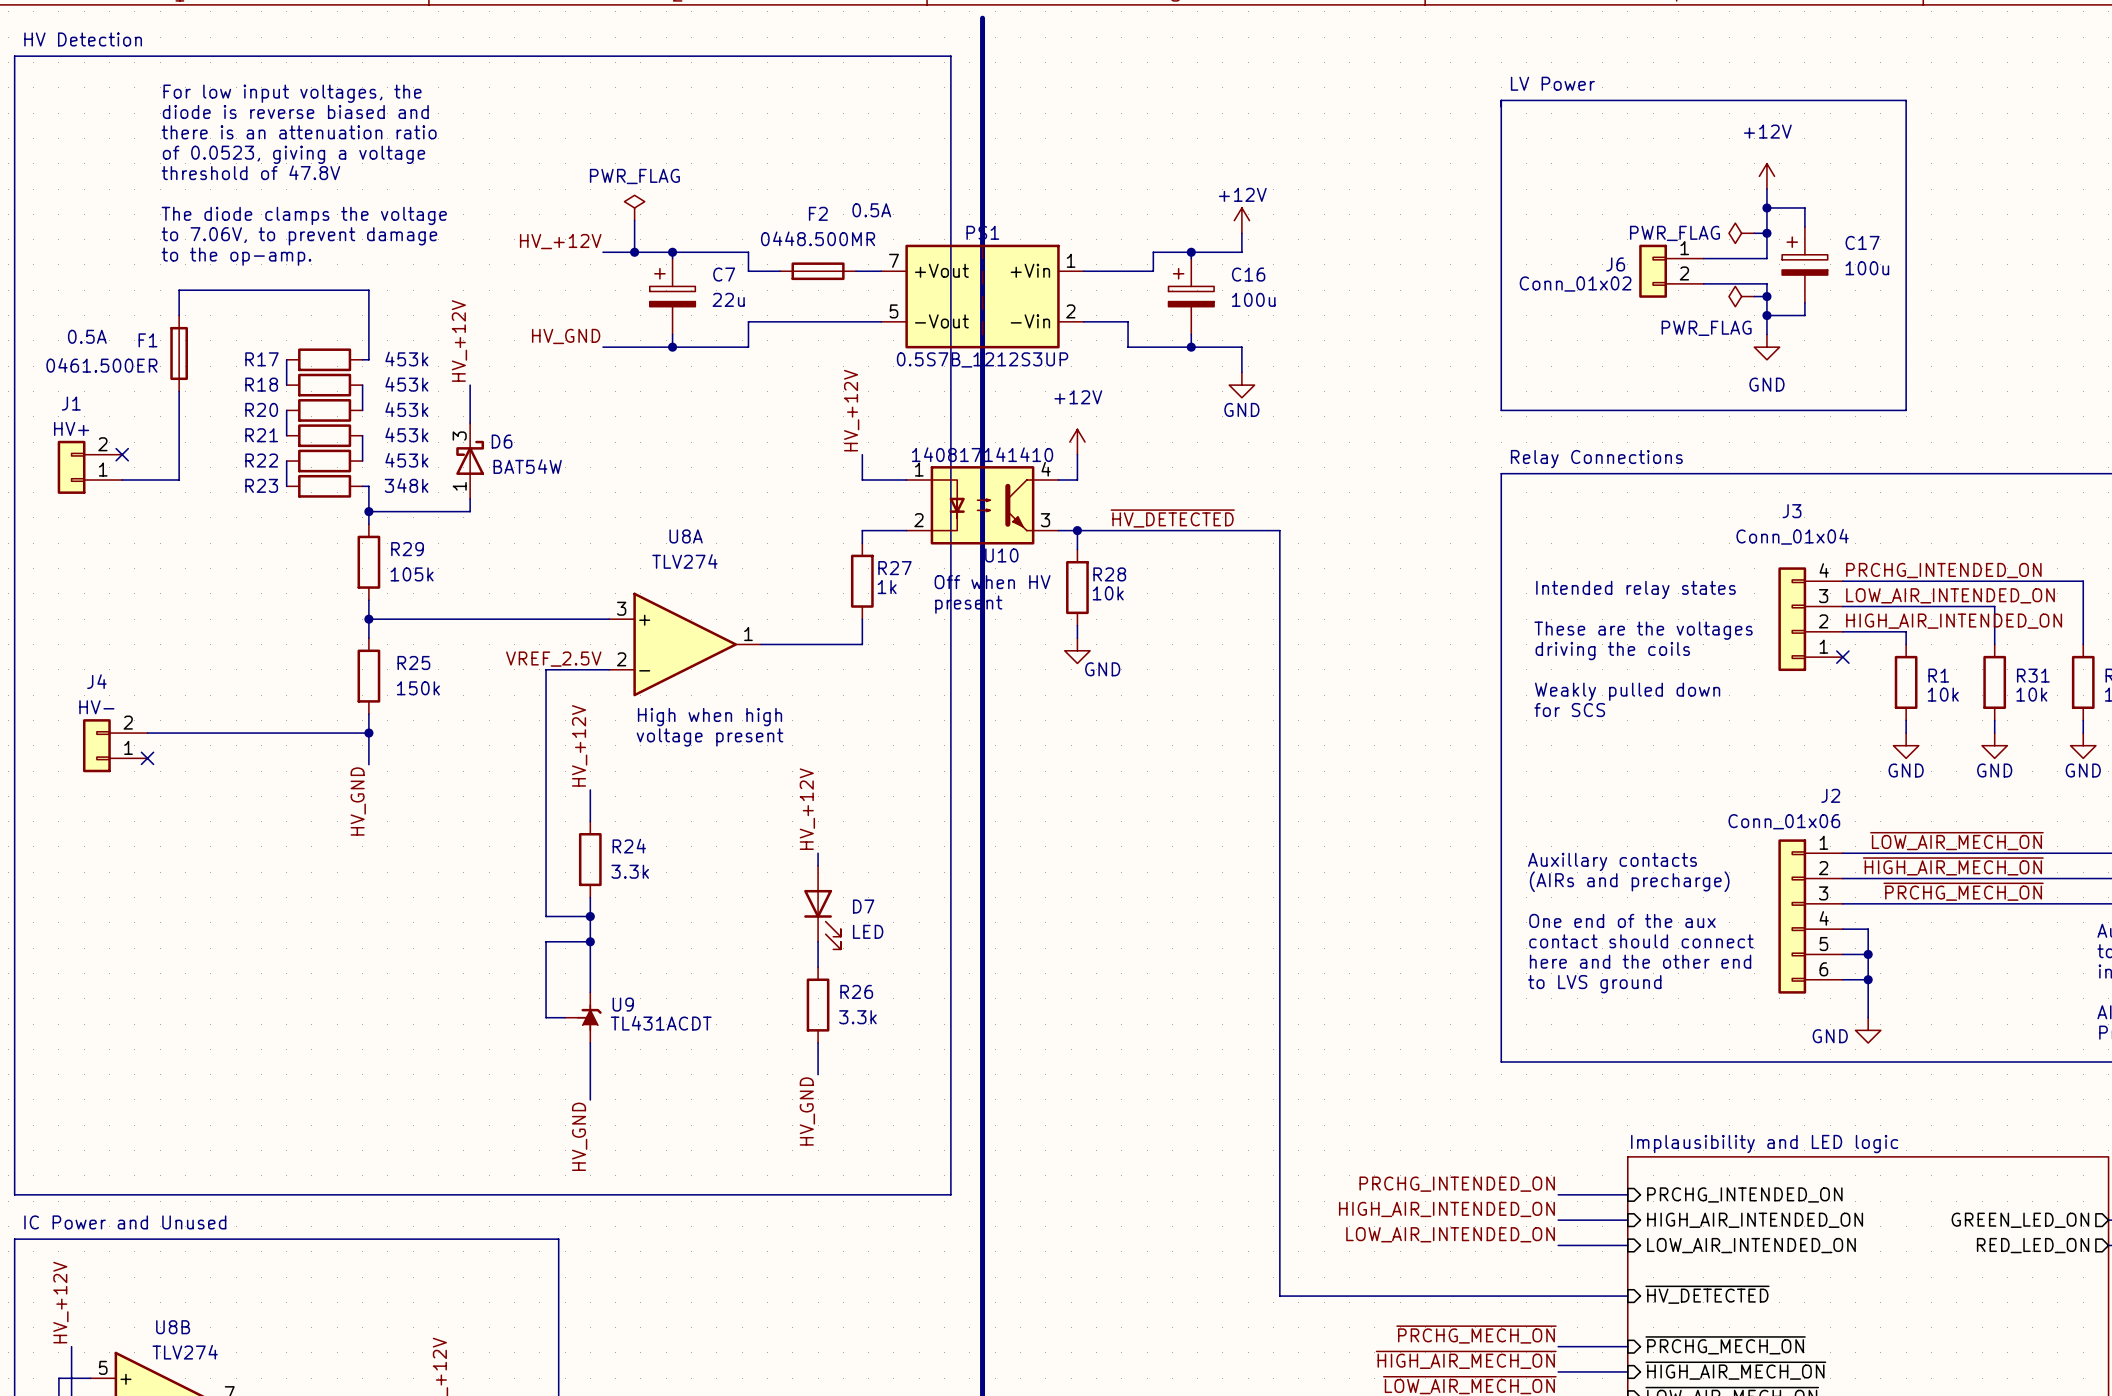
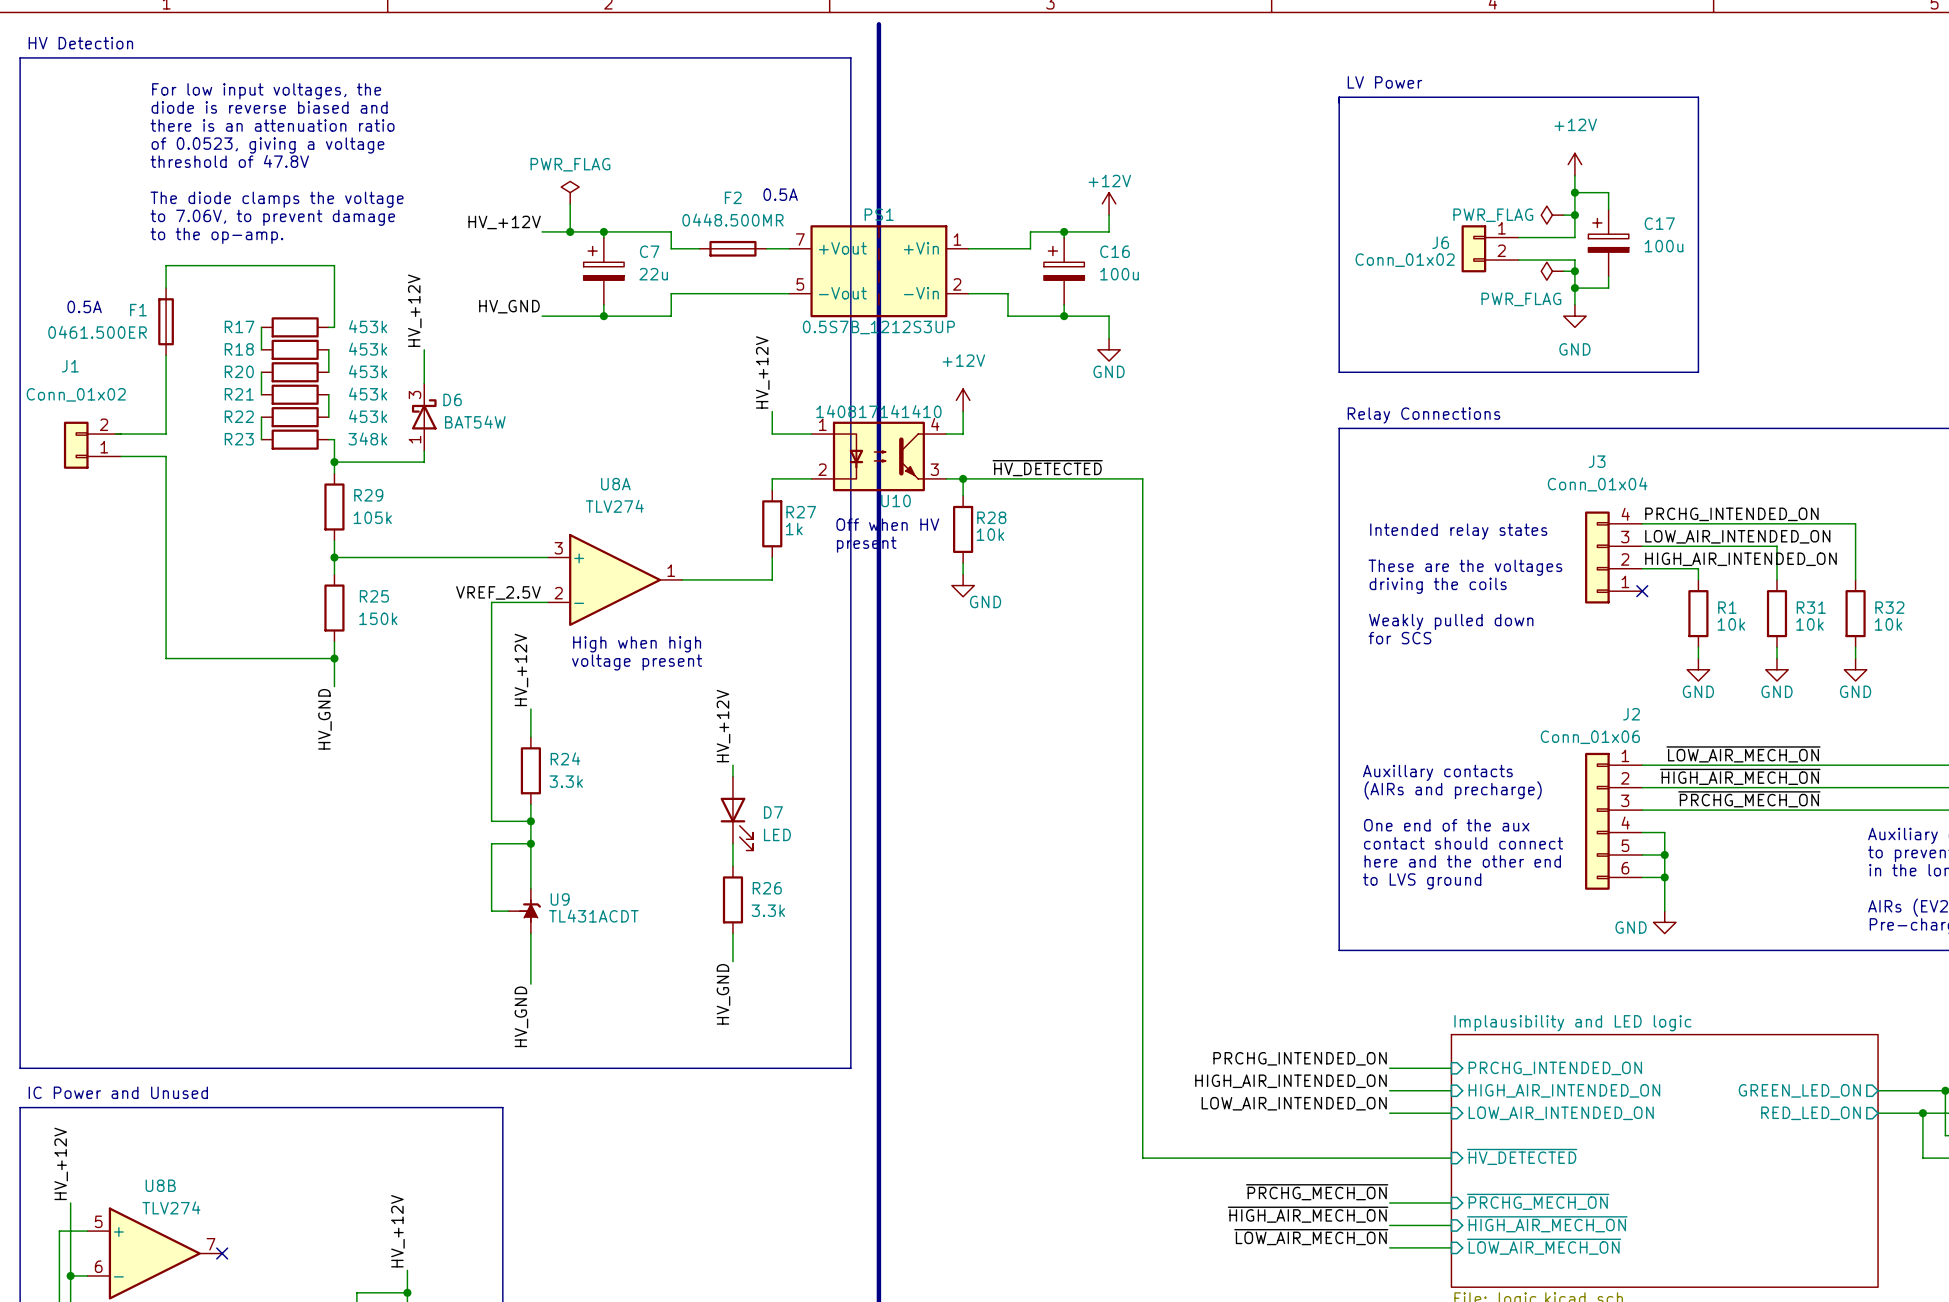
J1 value: HV+ (71, 428) -> Conn_01x02 (76, 394)
no-connect mark: (122, 454) -> none
J1 position: (89, 467) -> (92, 445)
wire: (147, 733) (179, 733) -> (121, 456) (166, 456) (166, 658)
J4: HV- (115, 745) -> none
no-connect mark: (147, 758) -> none

